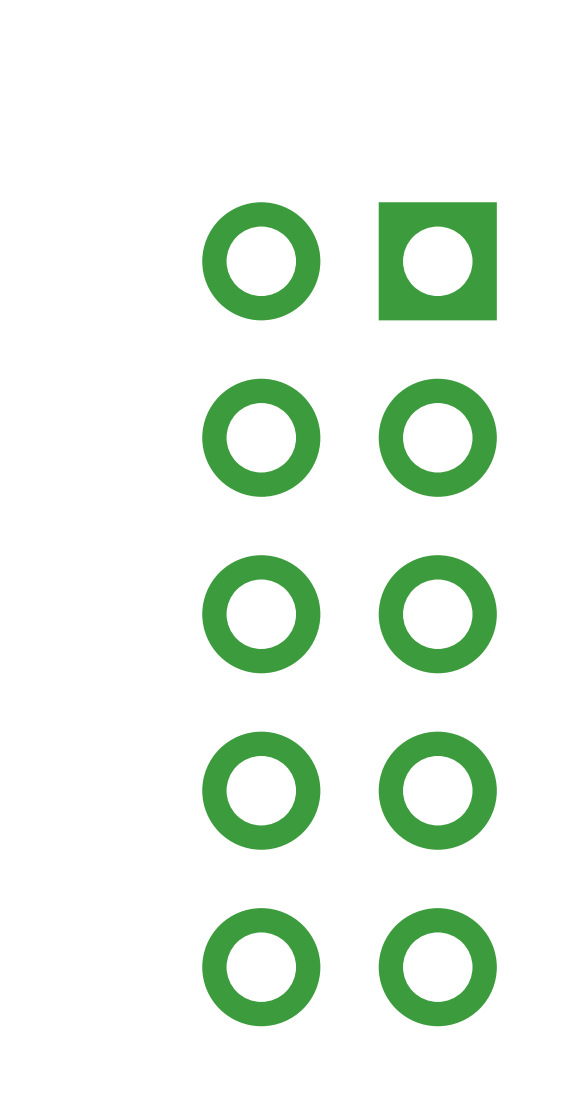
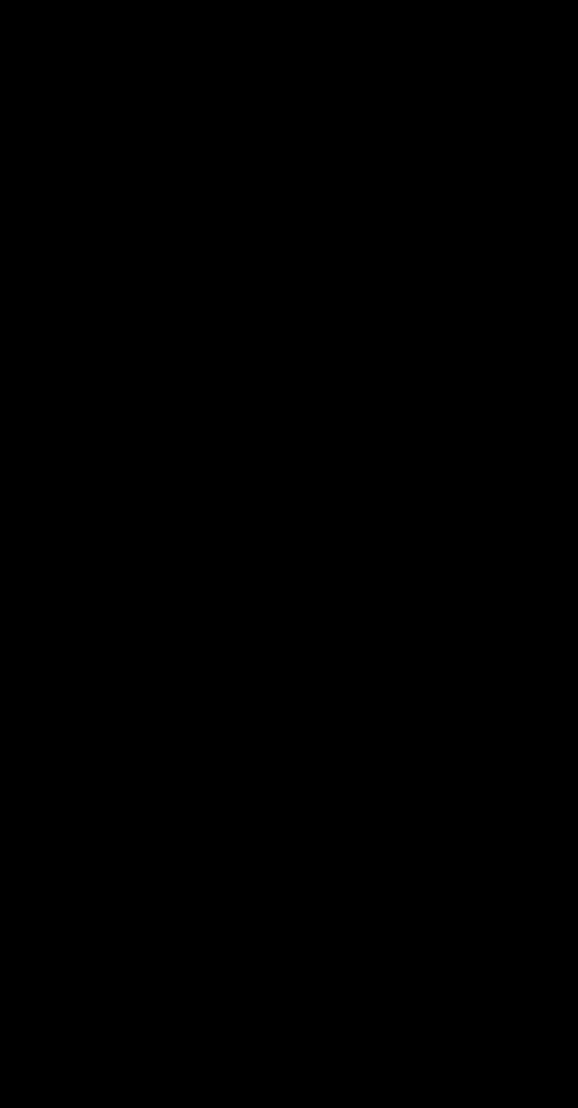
part: (349, 614) -> none

